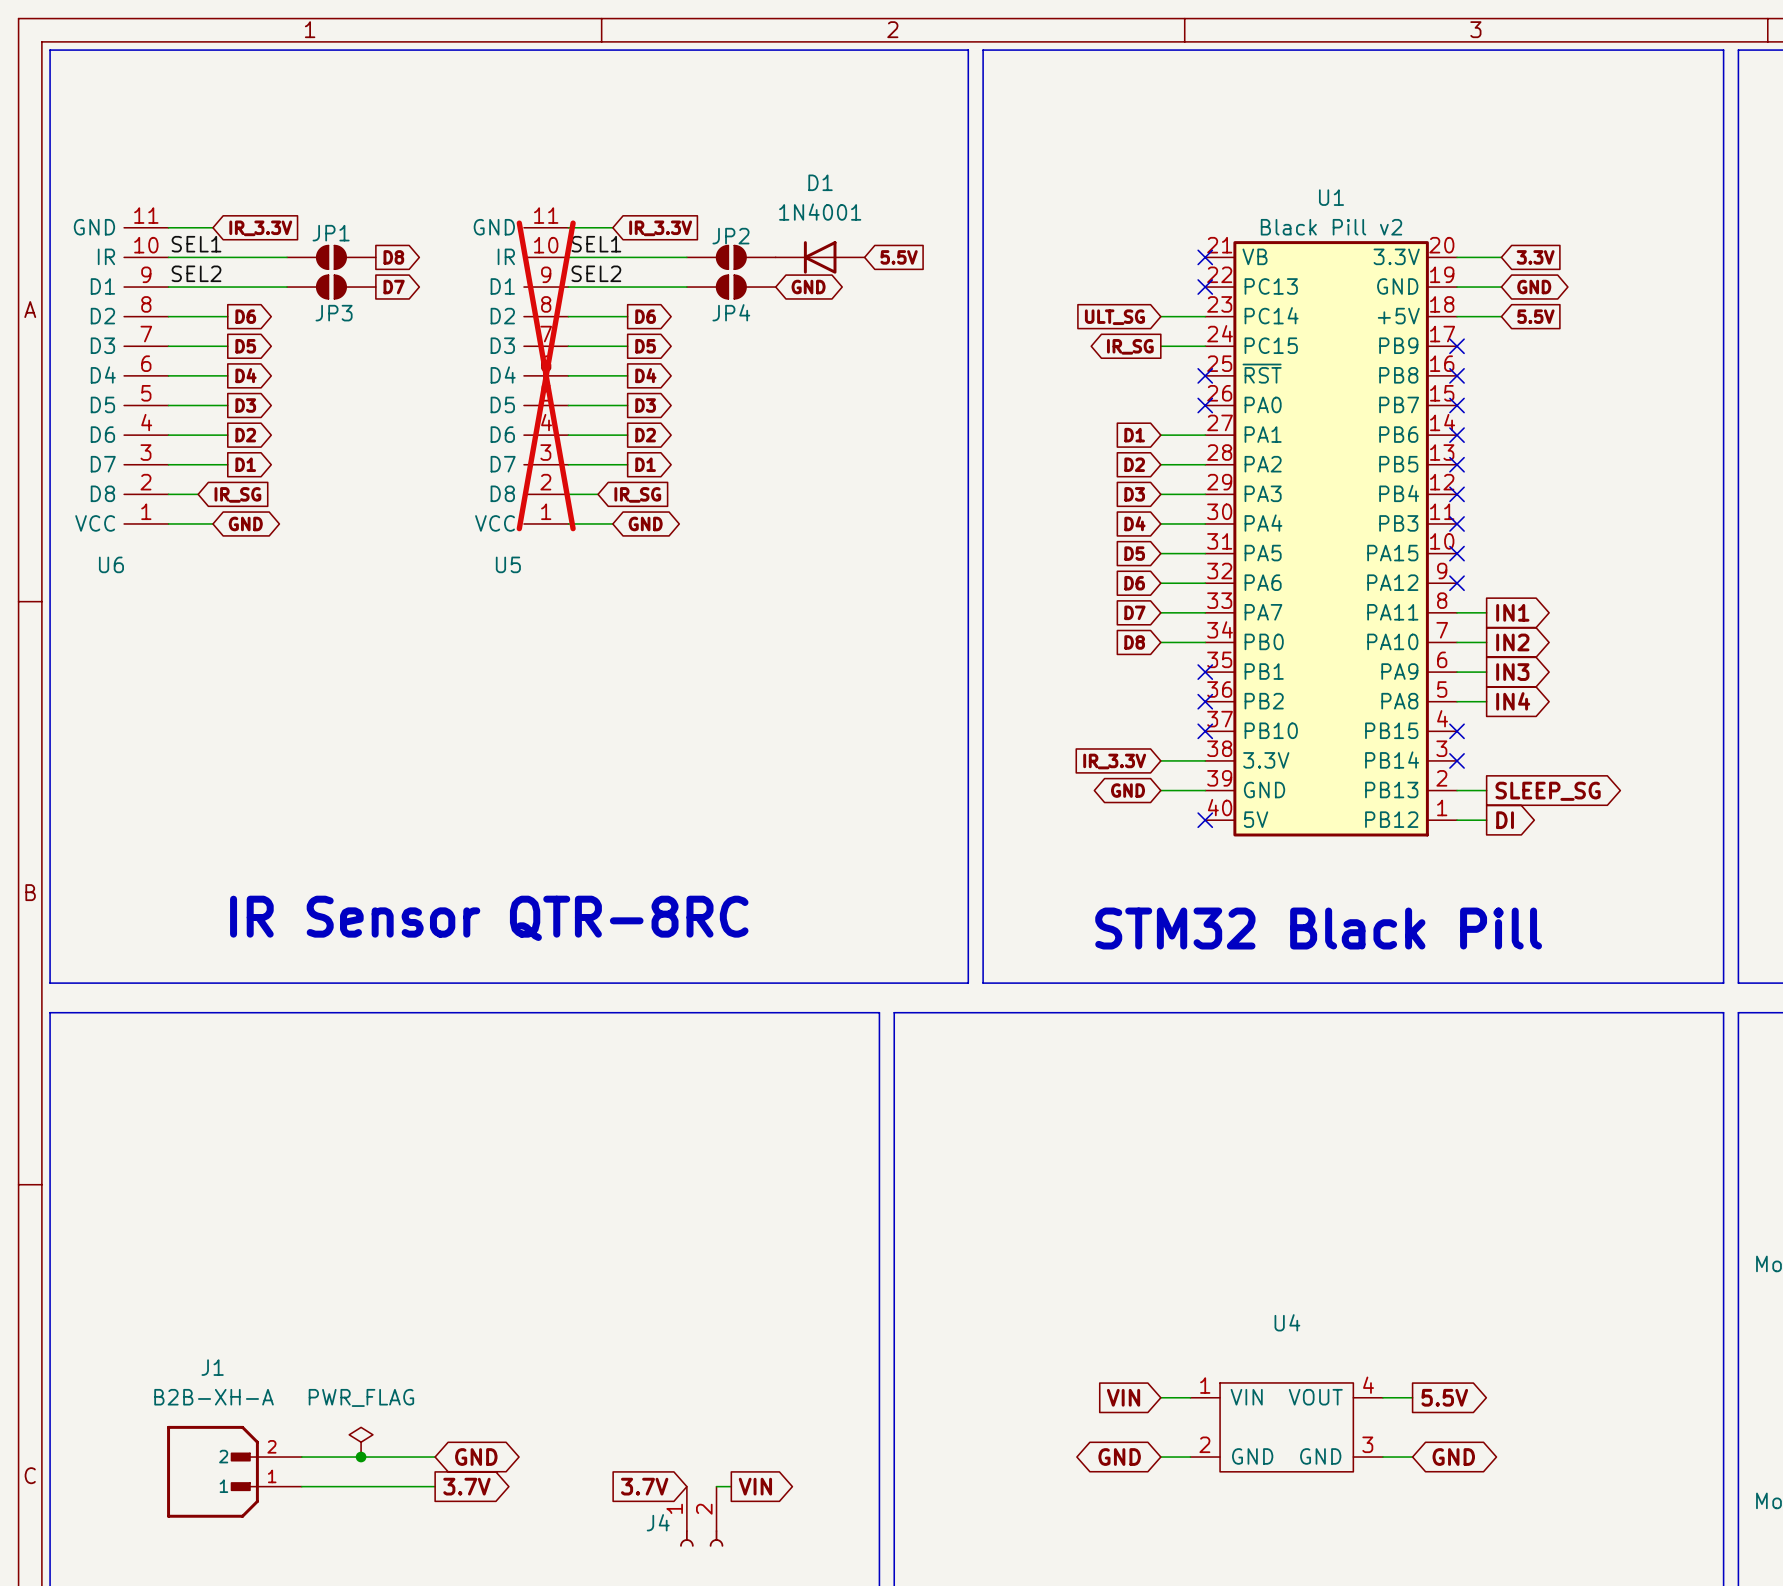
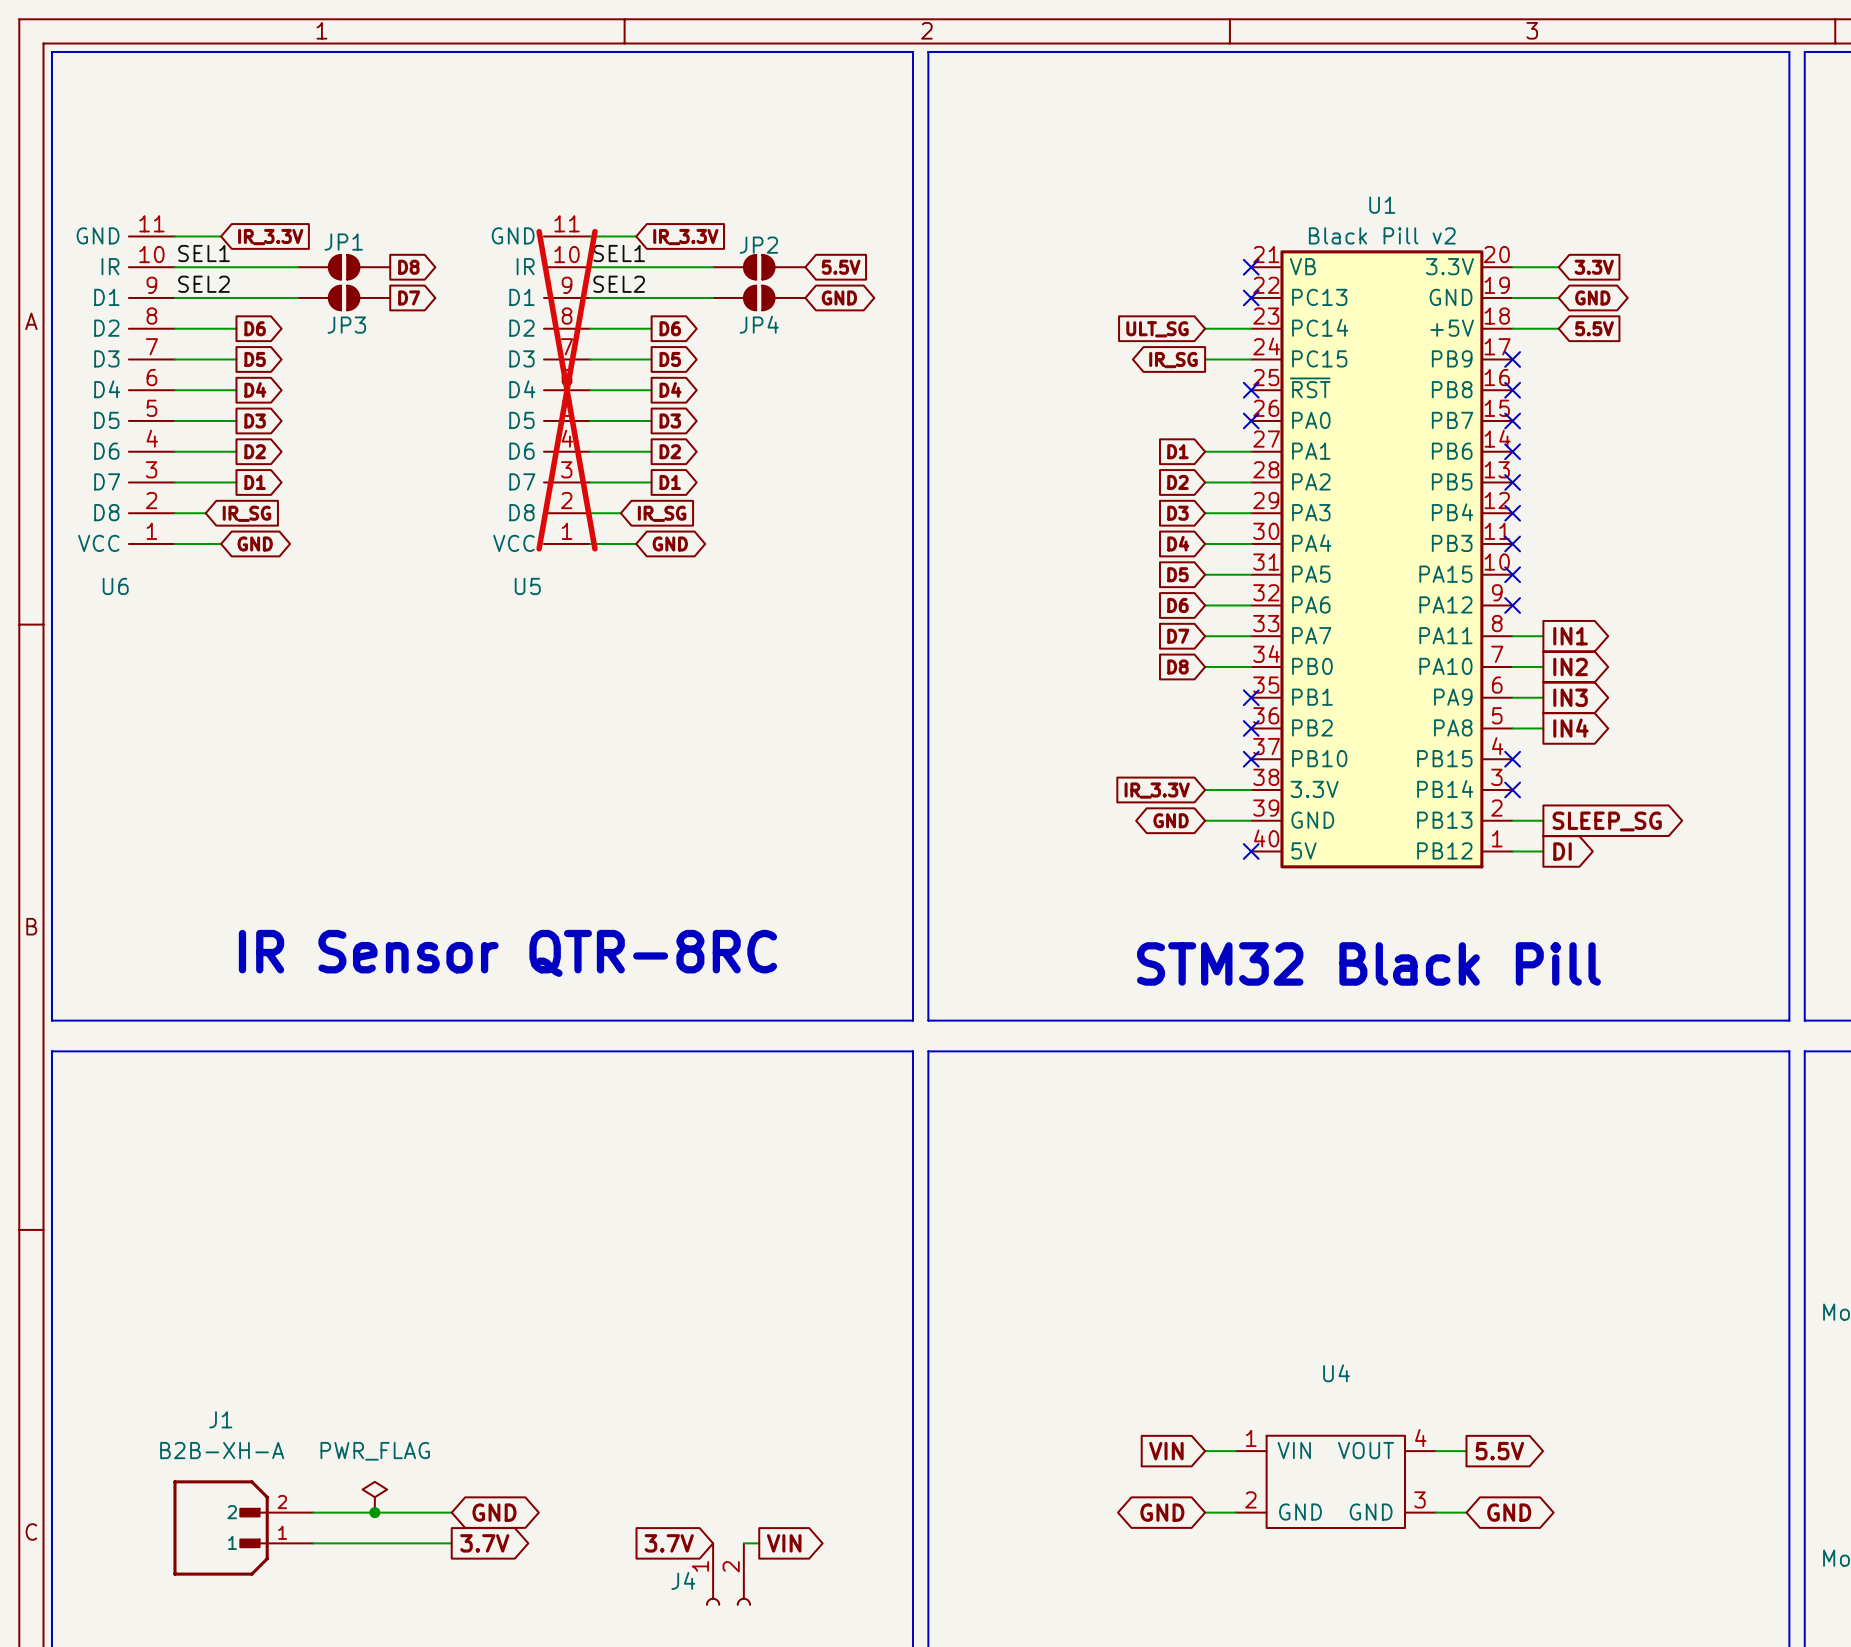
line: (879, 50) (894, 50) -> (912, 51) (912, 1020)
line: (968, 50) (968, 983) -> (1005, 51) (1020, 51)
line: (983, 50) (983, 983) -> (1005, 1020) (1020, 1020)
D1: 1N4001 (820, 257) -> none
global label position: 5.5V (899, 257) -> 5.5V (841, 267)
line: (879, 983) (894, 983) -> (928, 51) (928, 1020)

